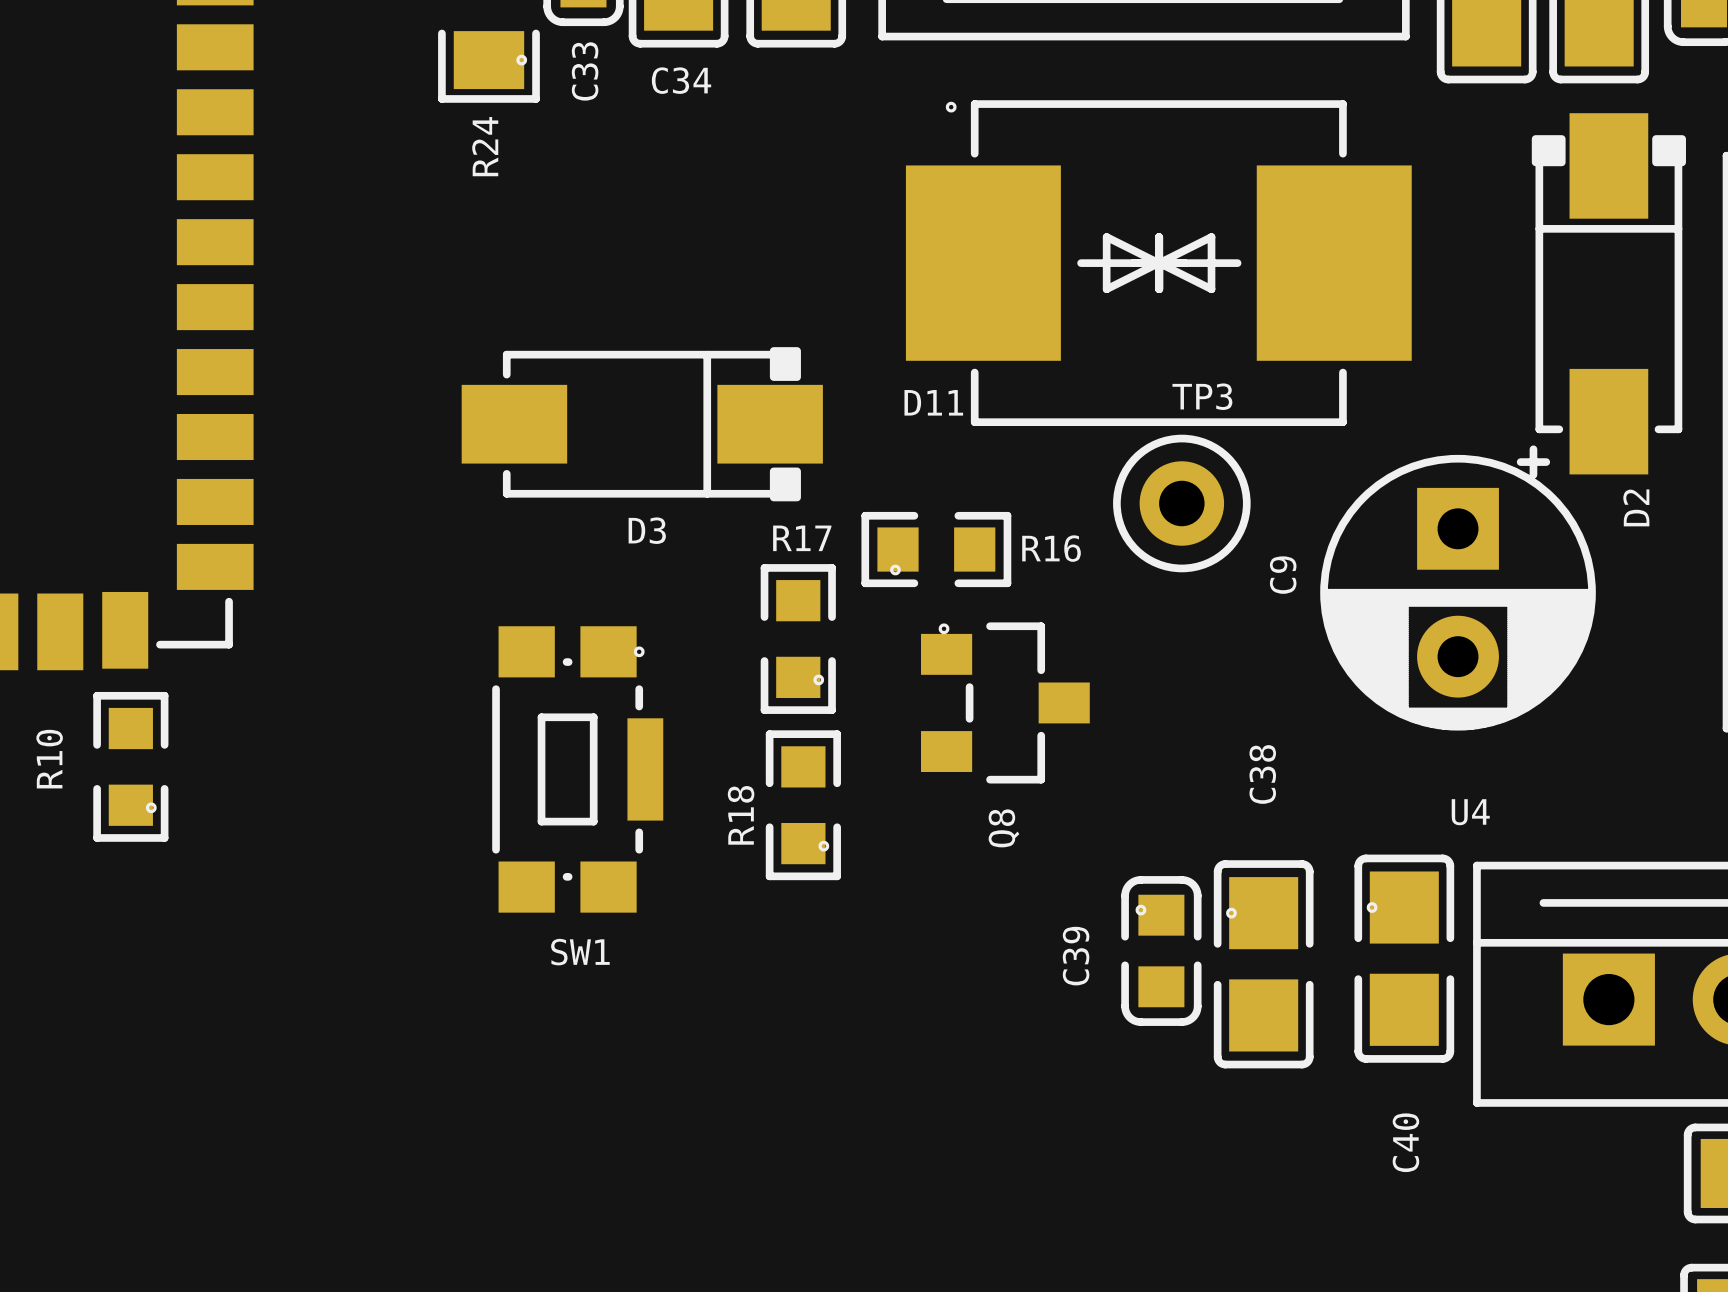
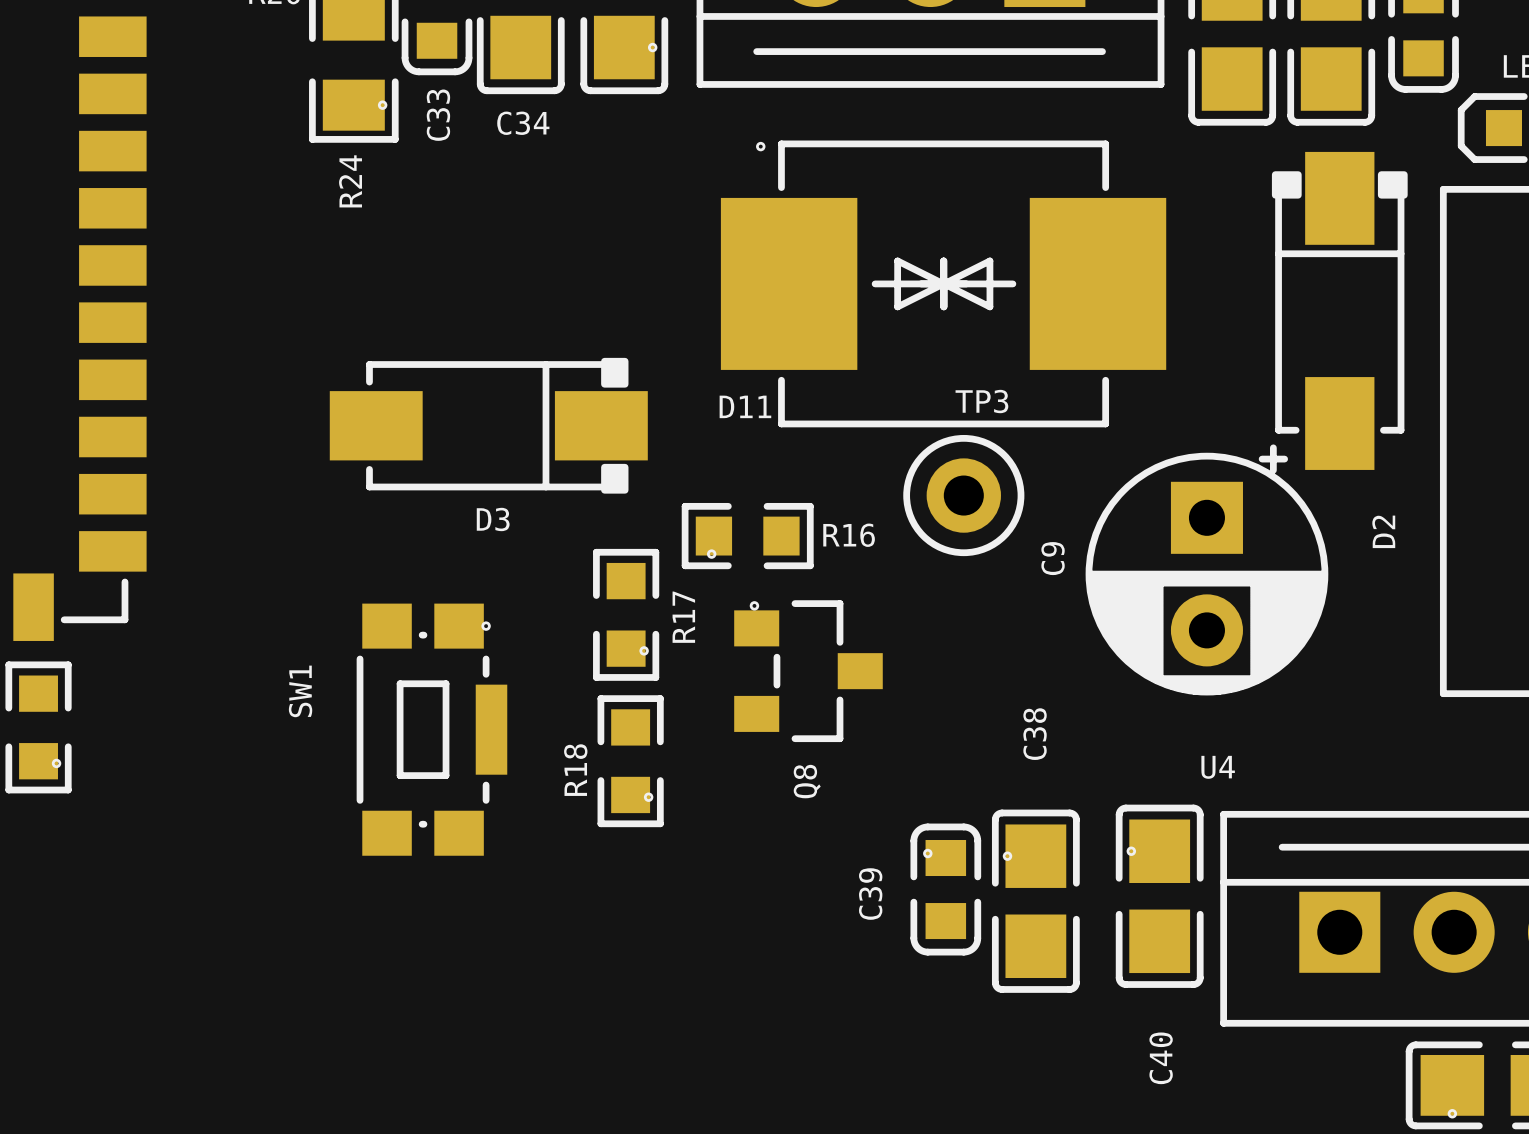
D2 name position: D2 (1636, 507) -> D2 (1383, 531)
R17 name rotation: 0° (802, 538) -> 90° counterclockwise (683, 617)
R17 name position: R17 (802, 538) -> R17 (683, 617)
SW1 name rotation: 0° (580, 952) -> 90° counterclockwise (300, 691)
SW1 name position: SW1 (580, 952) -> SW1 (300, 691)

